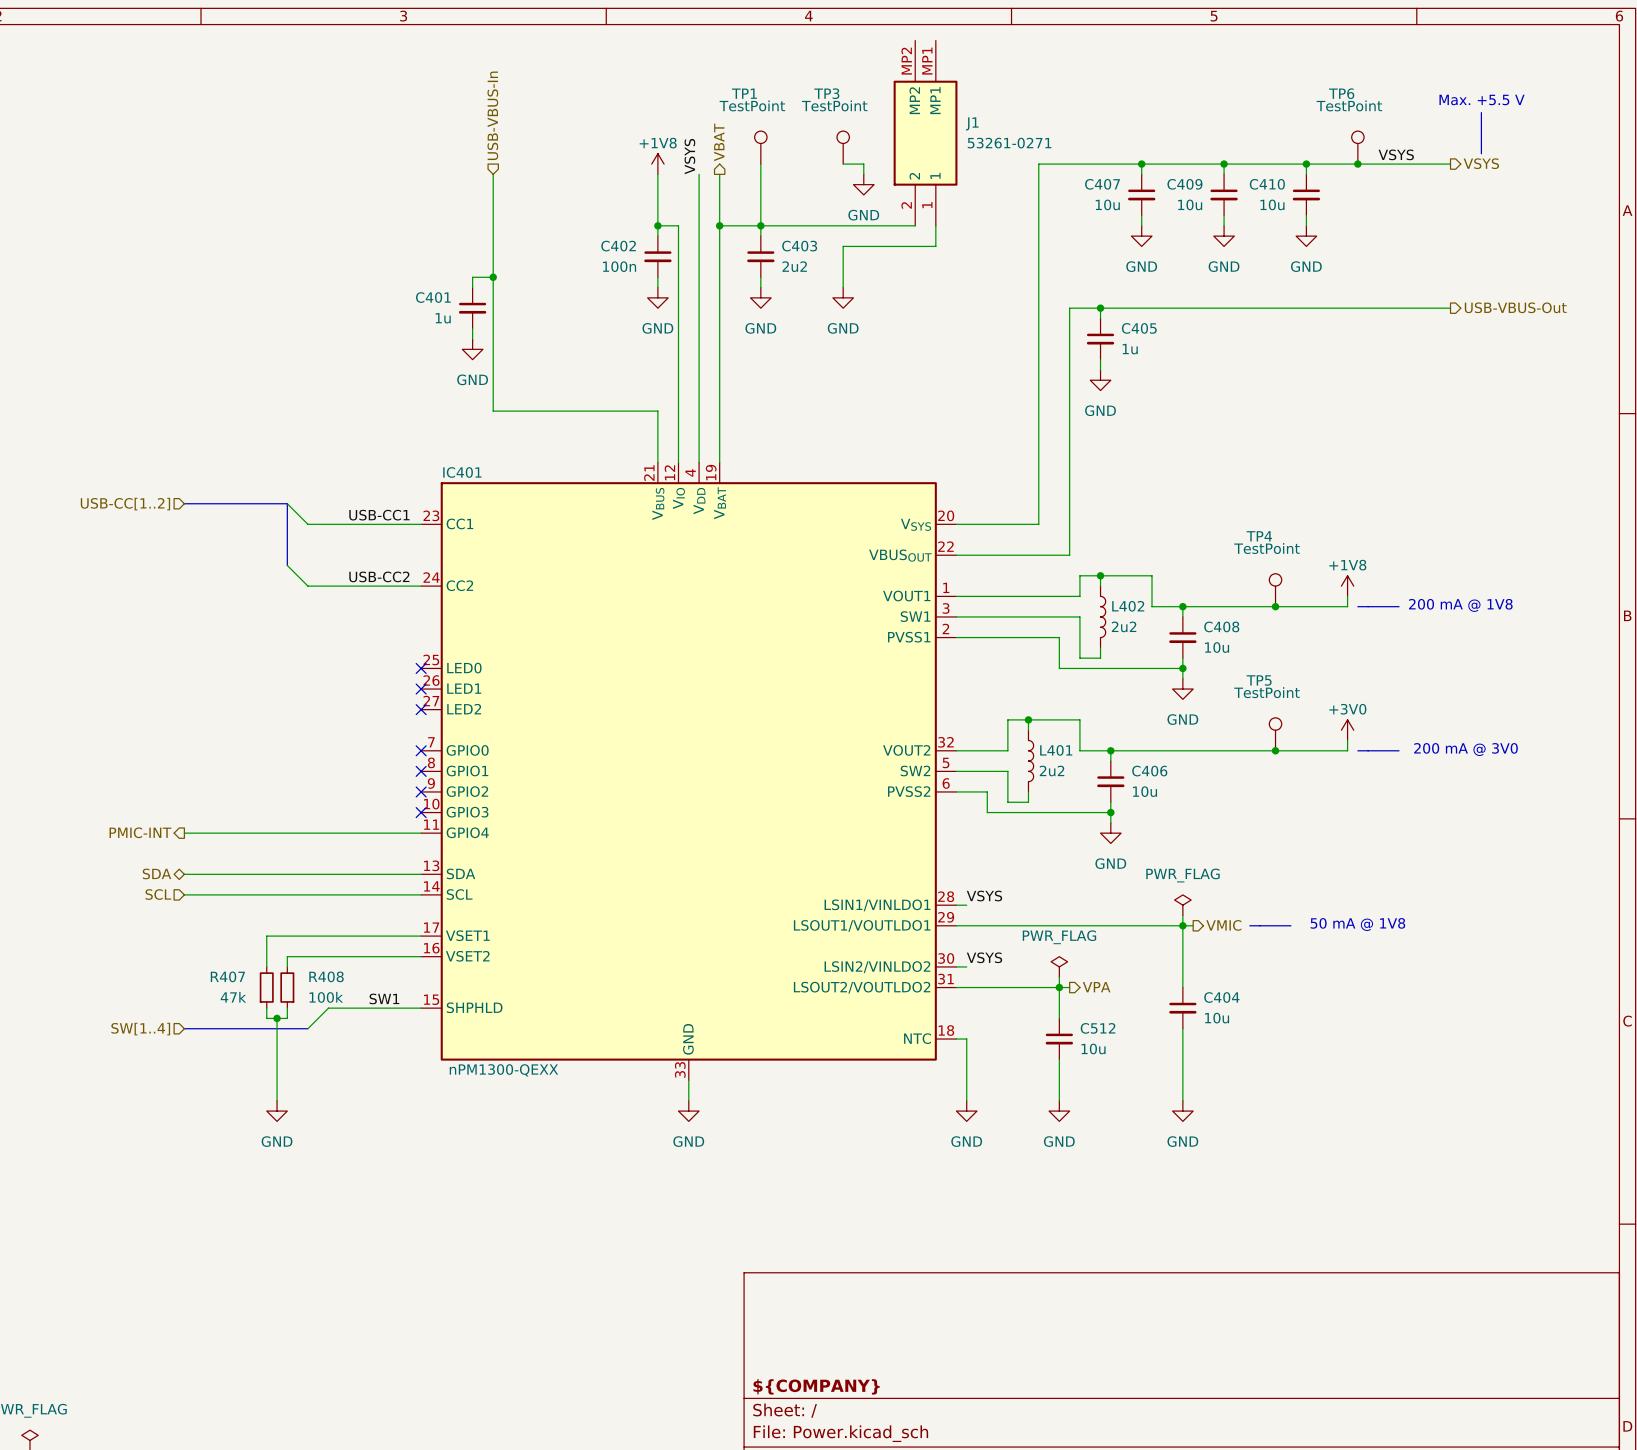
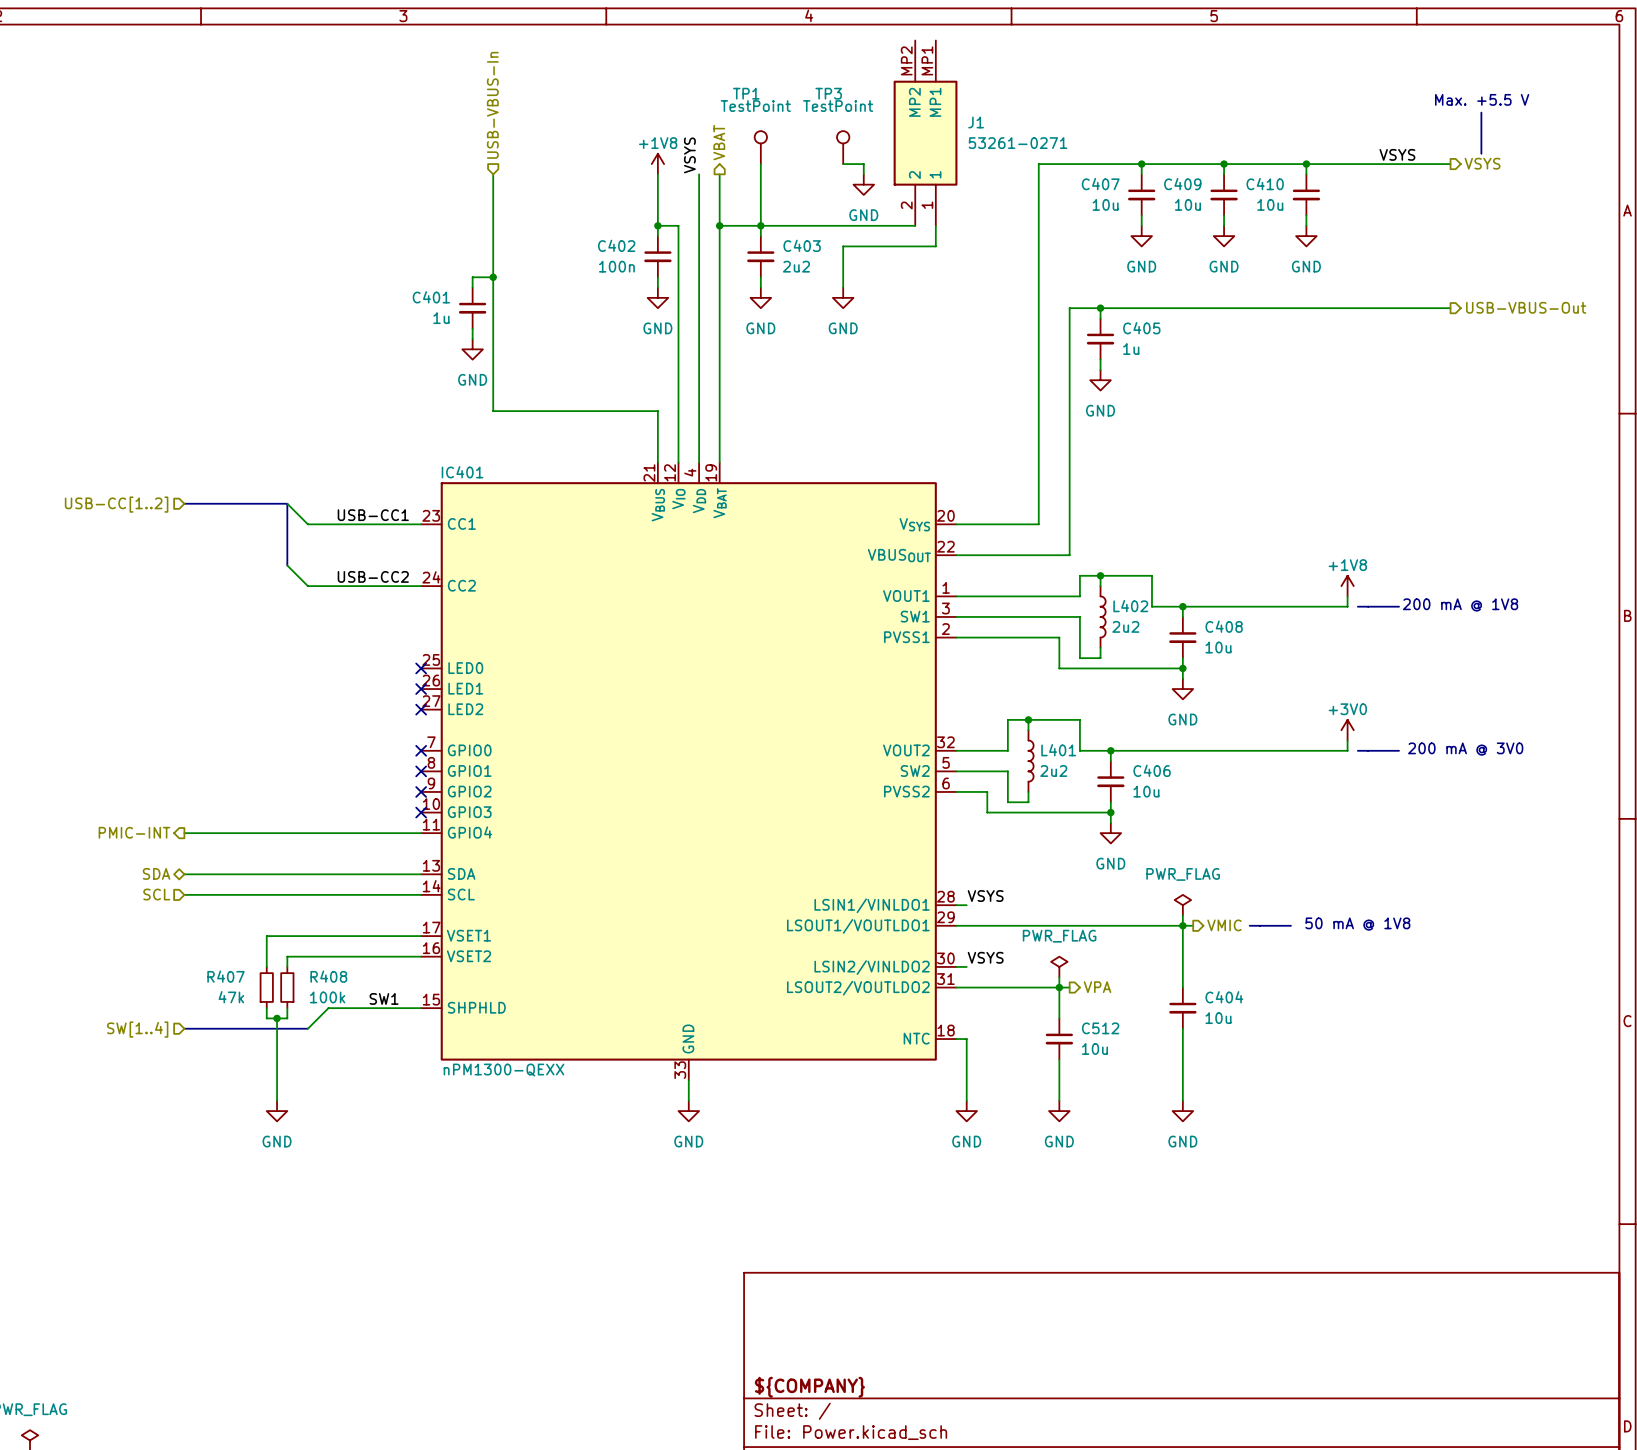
TP6: TestPoint (1357, 147) -> none
junction: (1357, 164) -> none
TP4: TestPoint (1275, 590) -> none
junction: (1275, 606) -> none
TP5: TestPoint (1275, 734) -> none
junction: (1275, 750) -> none

